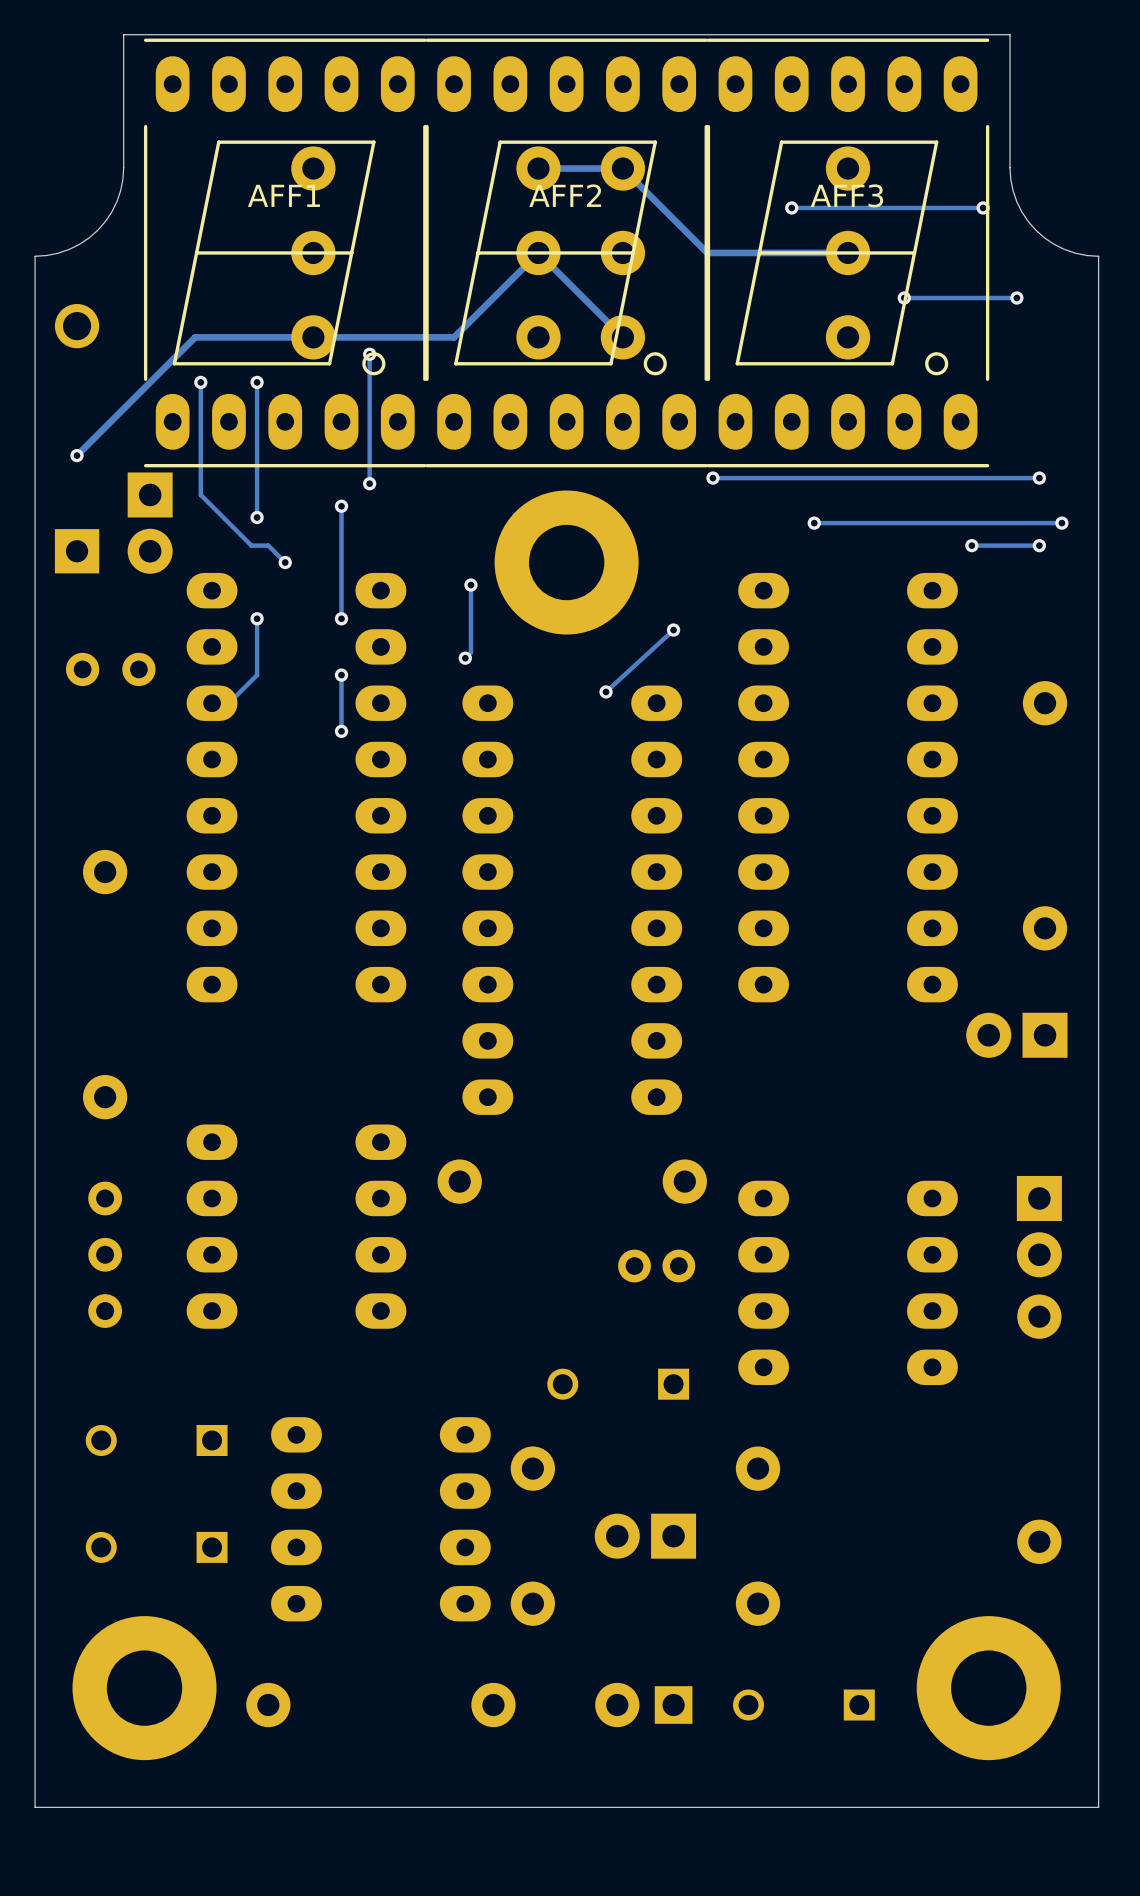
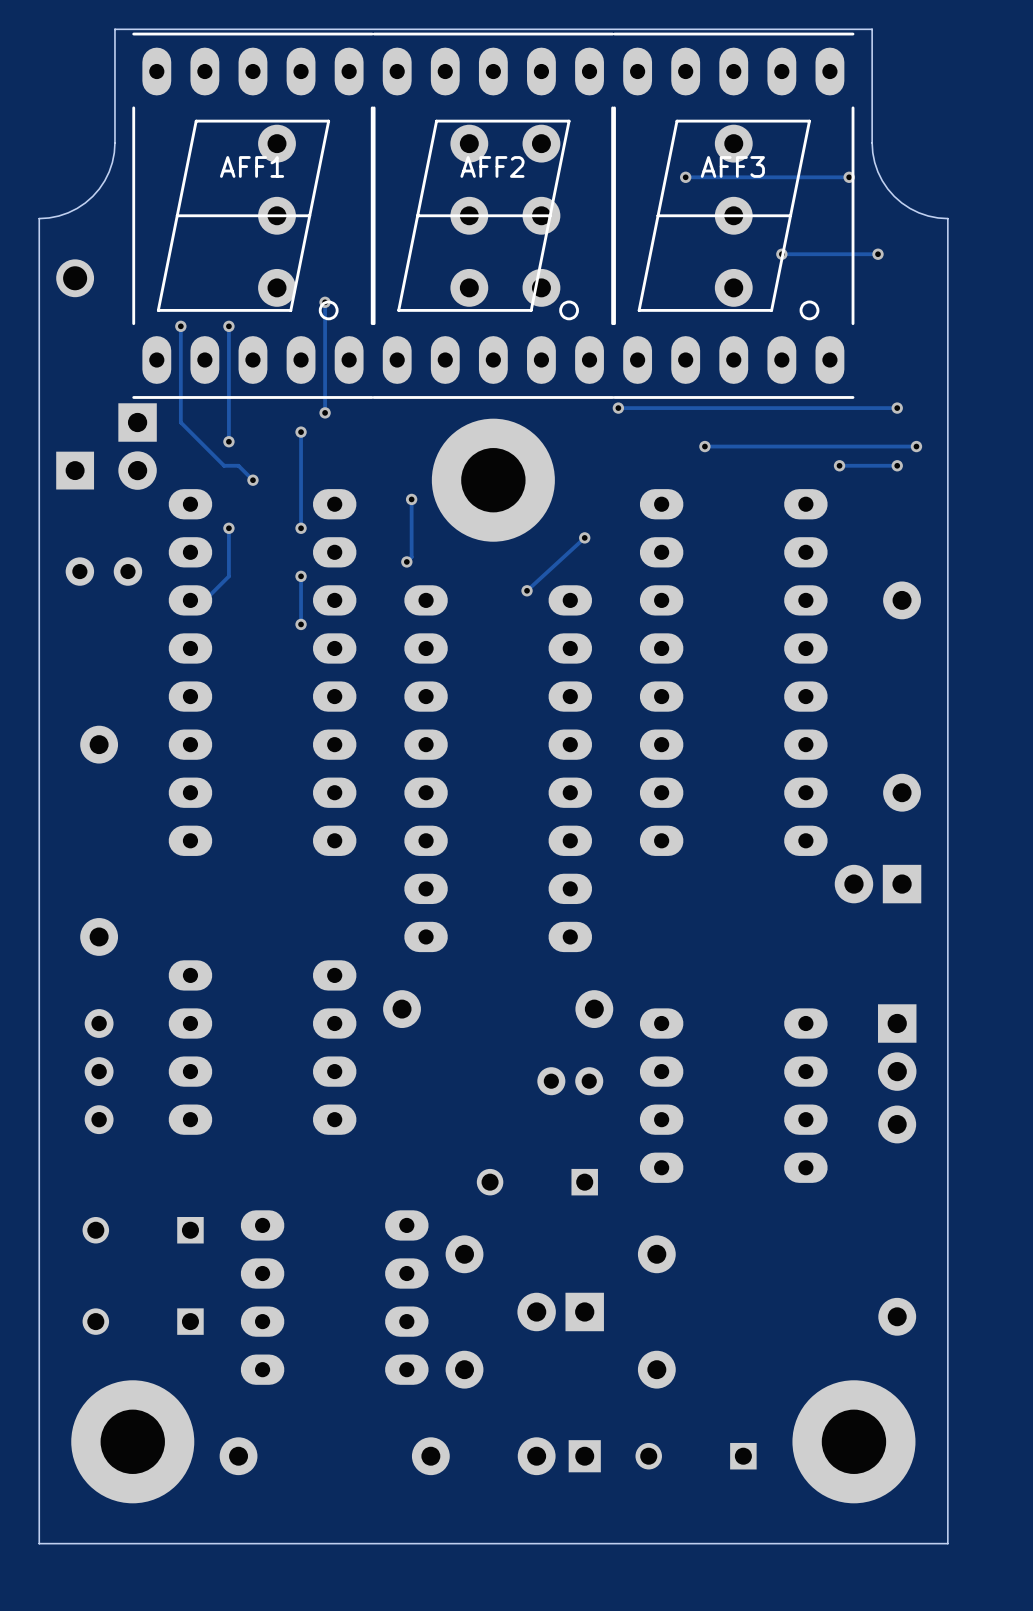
track: (538, 168) (622, 168) (707, 252) (848, 252) -> none
track: (622, 337) (538, 252) (454, 337) (195, 337) (76, 455) -> none
via: (76, 455) -> none

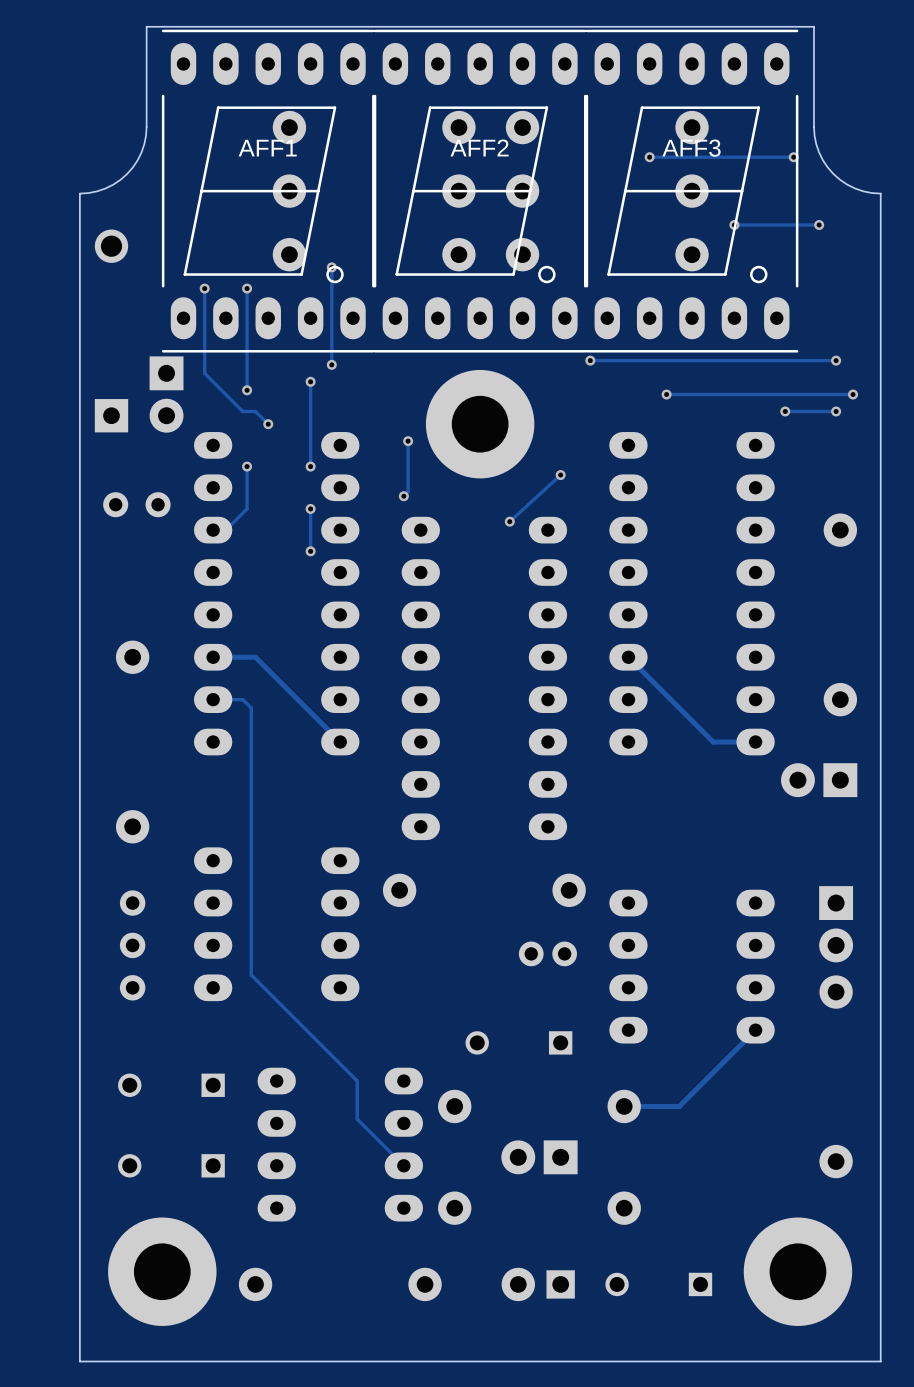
track: none -> (213, 657) (255, 657) (340, 742)
track: none -> (628, 657) (713, 742) (755, 742)
track: none -> (213, 699) (242, 699) (251, 708) (251, 975) (357, 1081) (357, 1119) (403, 1165)
track: none -> (755, 1030) (679, 1106) (624, 1106)

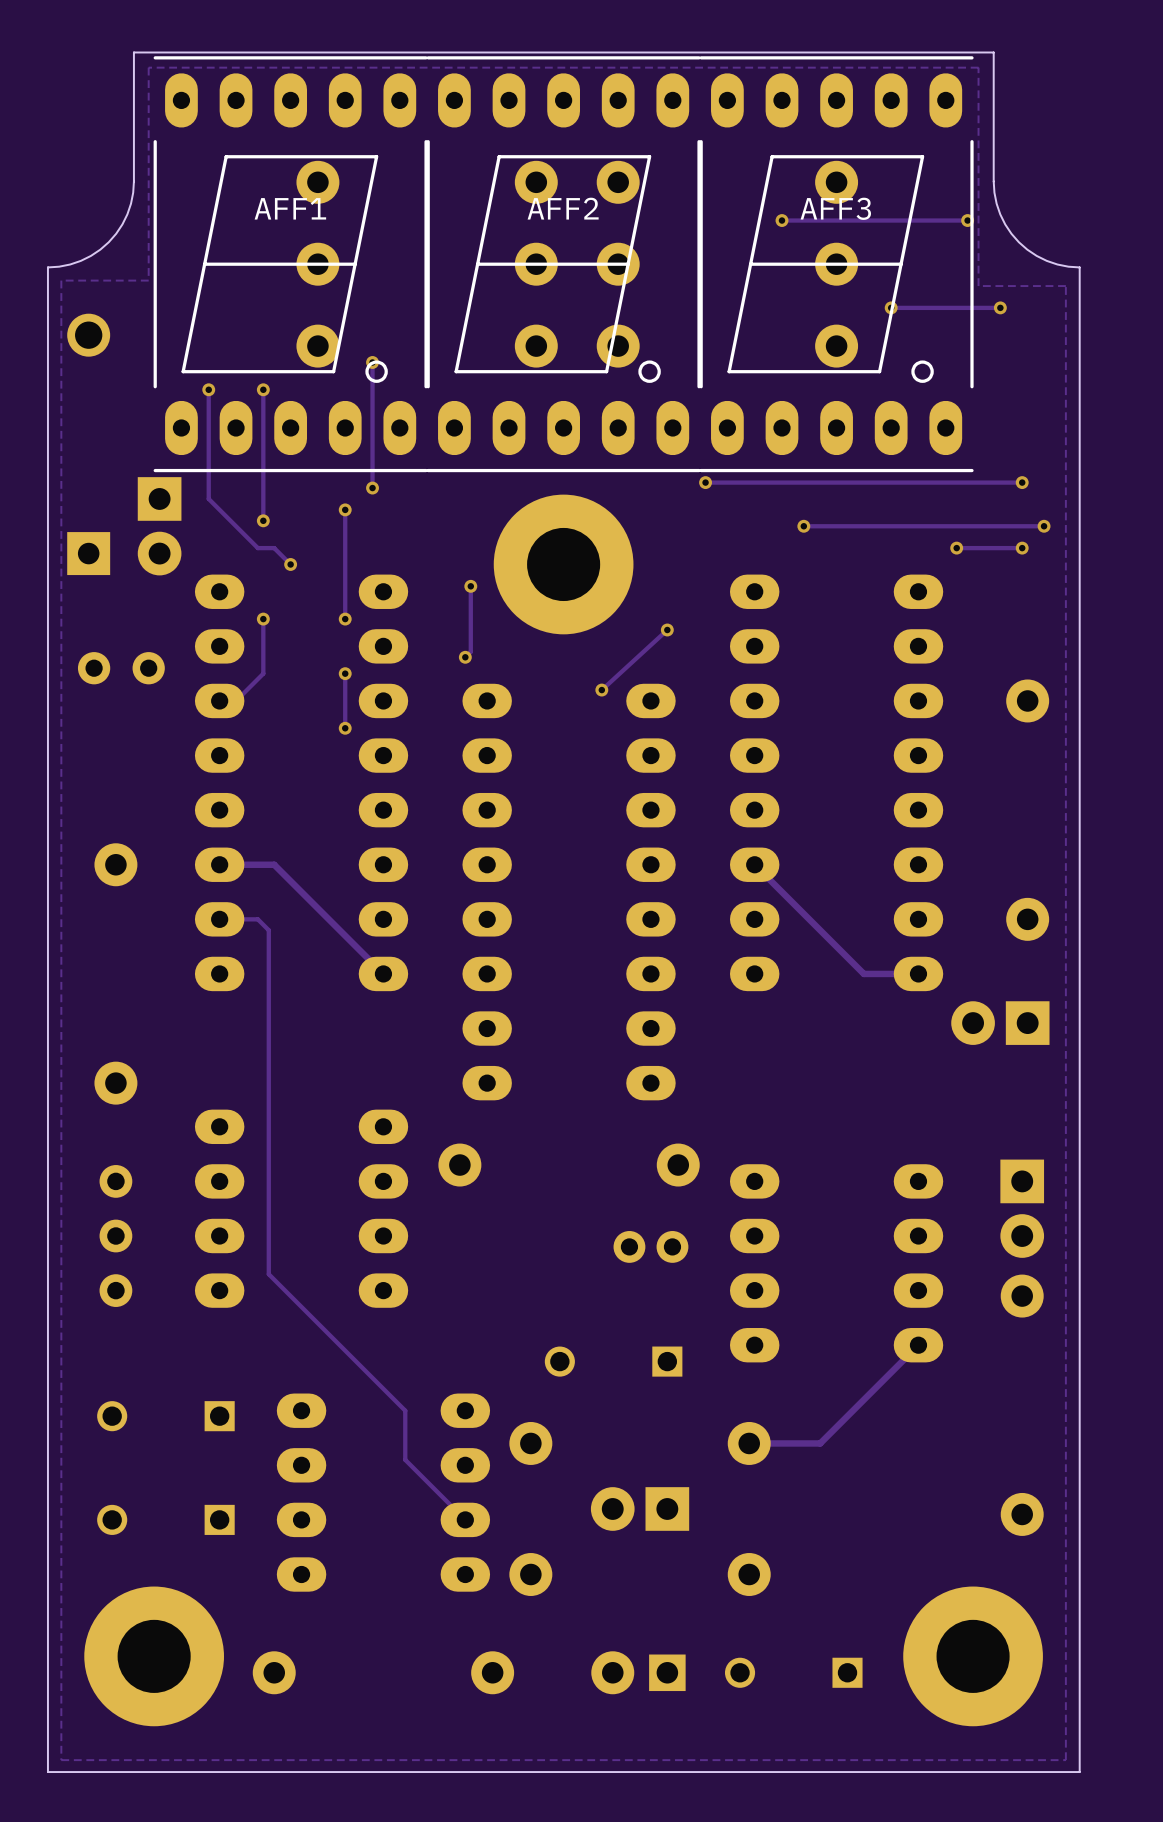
zone outline: none -> (978, 67) (978, 286) (1065, 286) (1065, 1760) (61, 1760) (61, 280) (148, 280) (148, 67) (978, 67)

